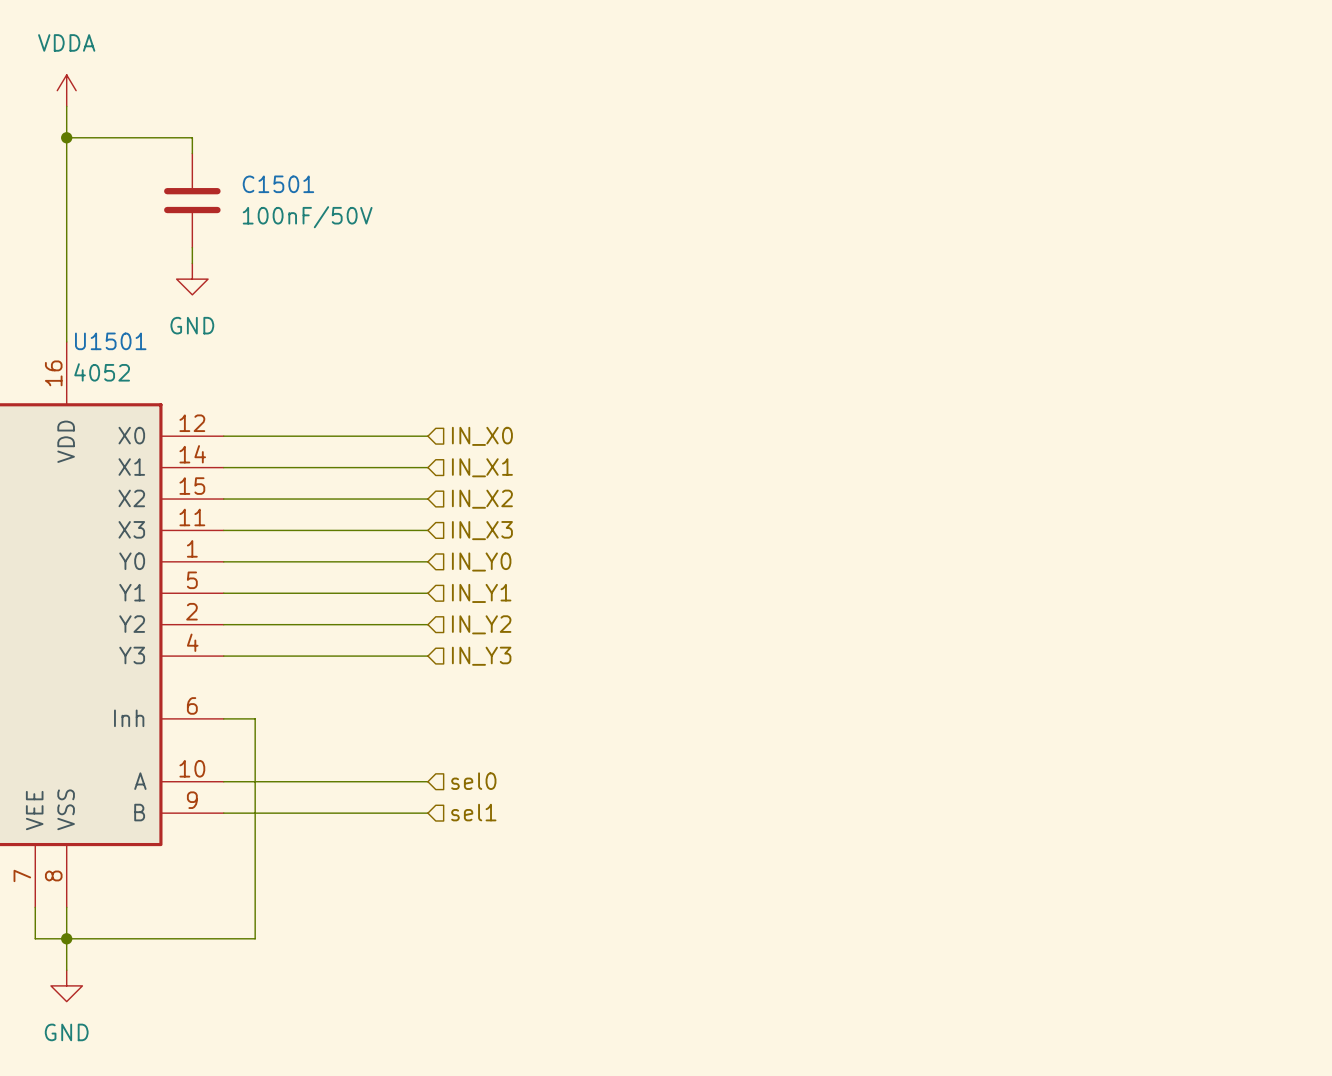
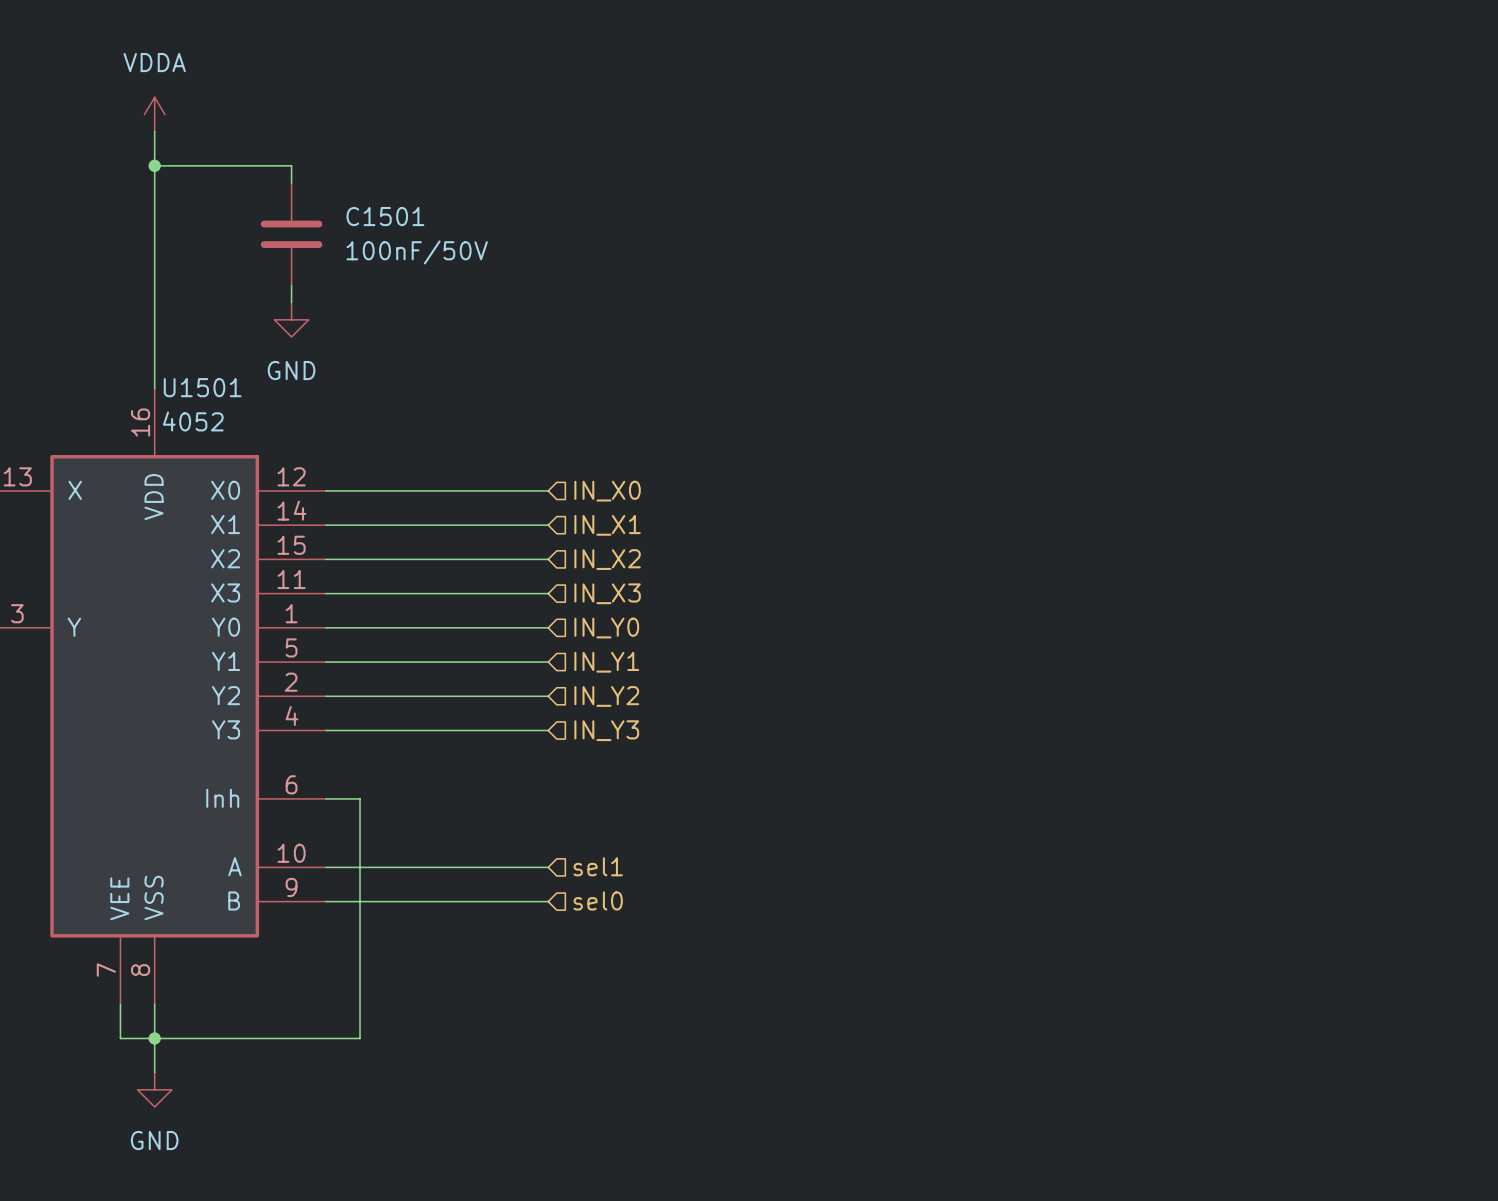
hierarchical label: sel0 (473, 781) -> sel1 (598, 866)
hierarchical label: sel1 (473, 812) -> sel0 (598, 900)

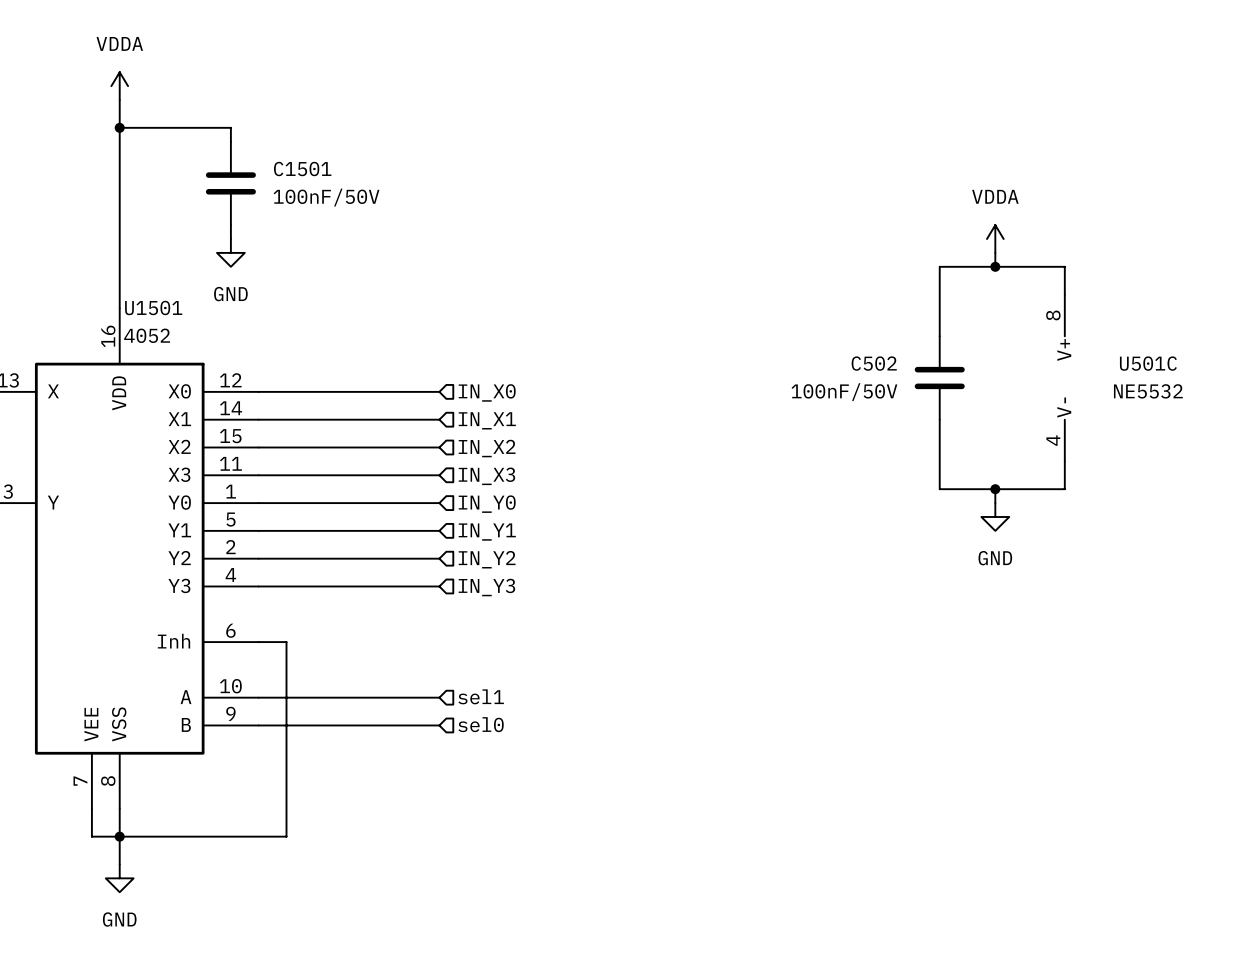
power symbol: none -> VDDA (995, 239)
wire: none -> (995, 252) (995, 266)
junction: none -> (995, 266)
wire: none -> (1064, 294) (1064, 266) (939, 266) (939, 336)
C502: none -> 100nF/50V (939, 378)
U501C: none -> NE5532 (1064, 378)
wire: none -> (939, 419) (939, 489) (1064, 489) (1064, 461)
wire: none -> (995, 489) (995, 503)
junction: none -> (995, 489)
power symbol: none -> GND (995, 516)

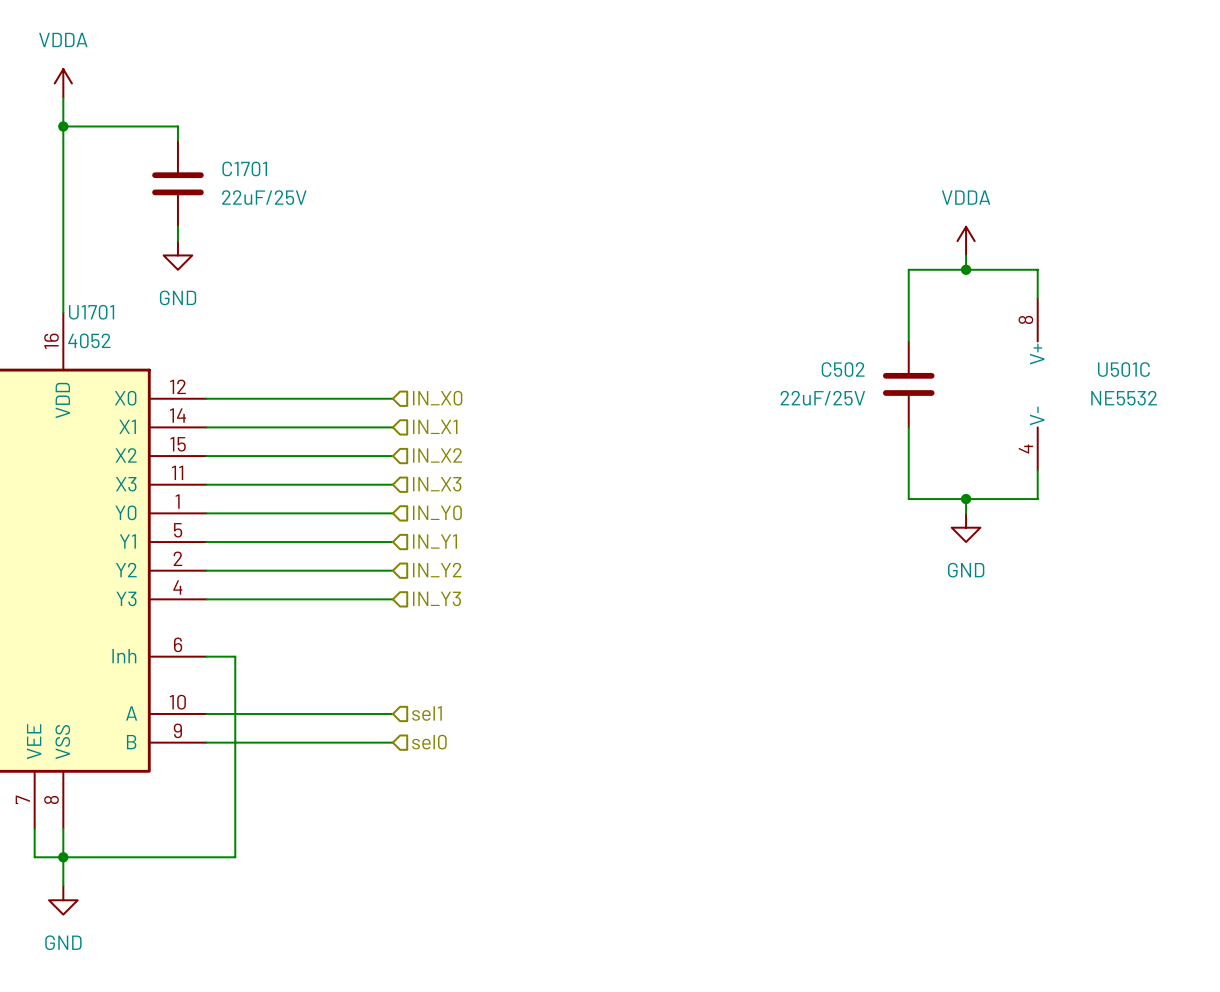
C1501 name: C1501 (302, 169) -> C1701 (244, 168)
C1501 value: 100nF/50V (326, 197) -> 22uF/25V (264, 197)
U1501 name: U1501 (153, 307) -> U1701 (91, 312)
C502 value: 100nF/50V (844, 392) -> 22uF/25V (822, 398)

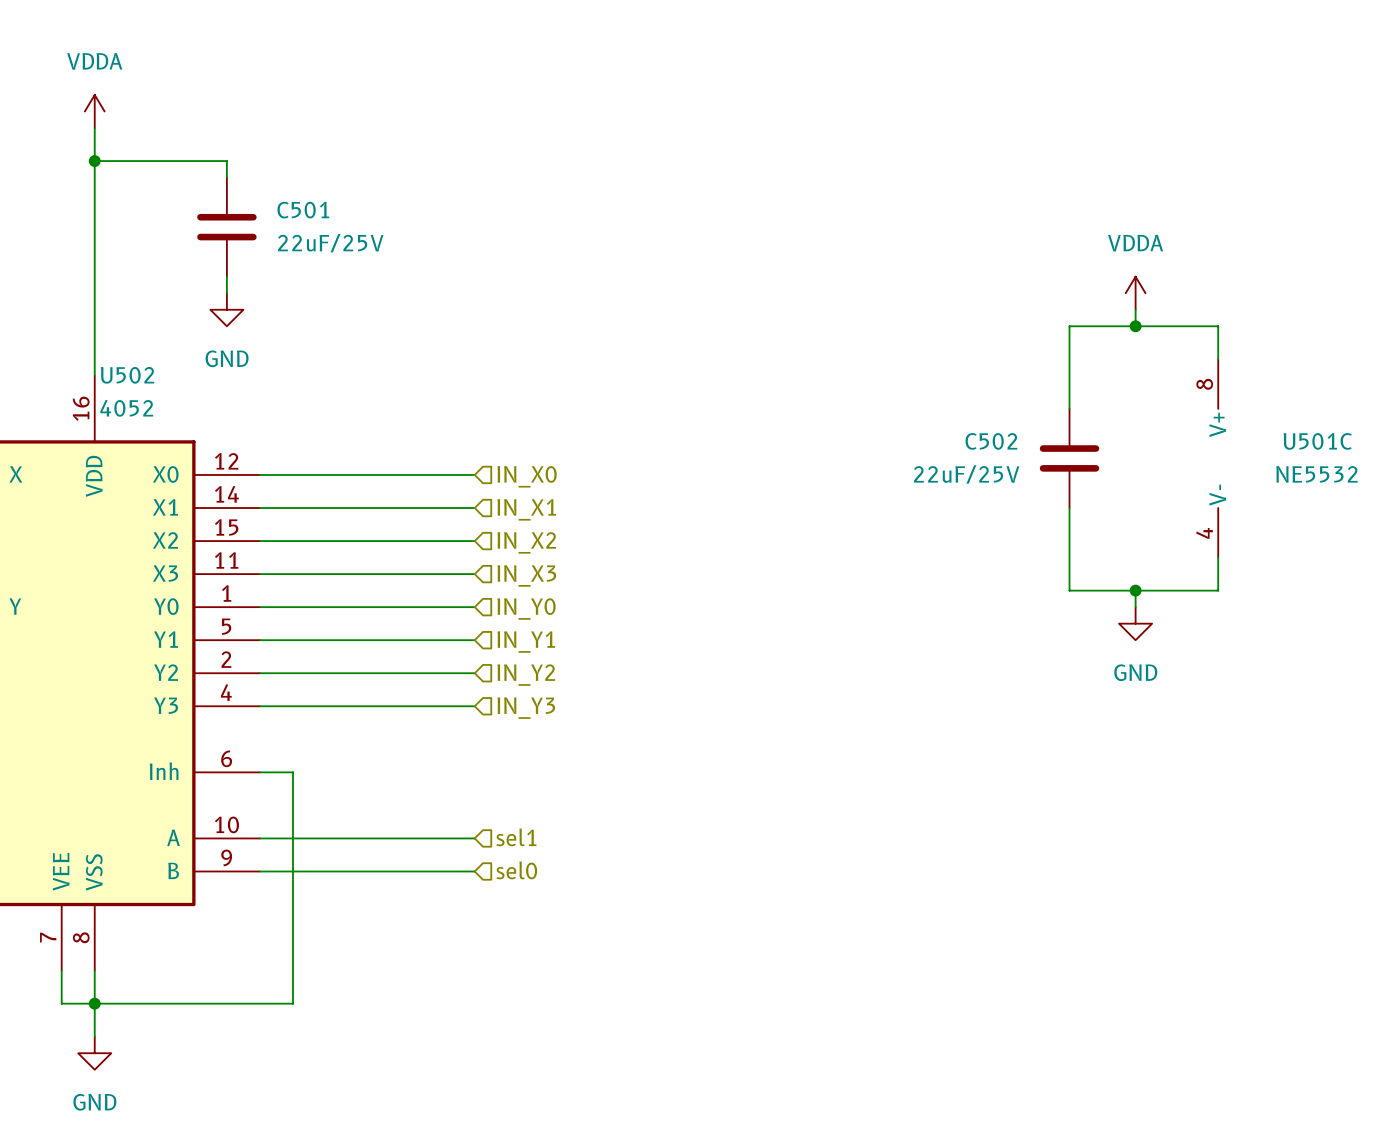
C1701 name: C1701 (244, 168) -> C501 (303, 210)
U1701 name: U1701 (91, 312) -> U502 (127, 375)

